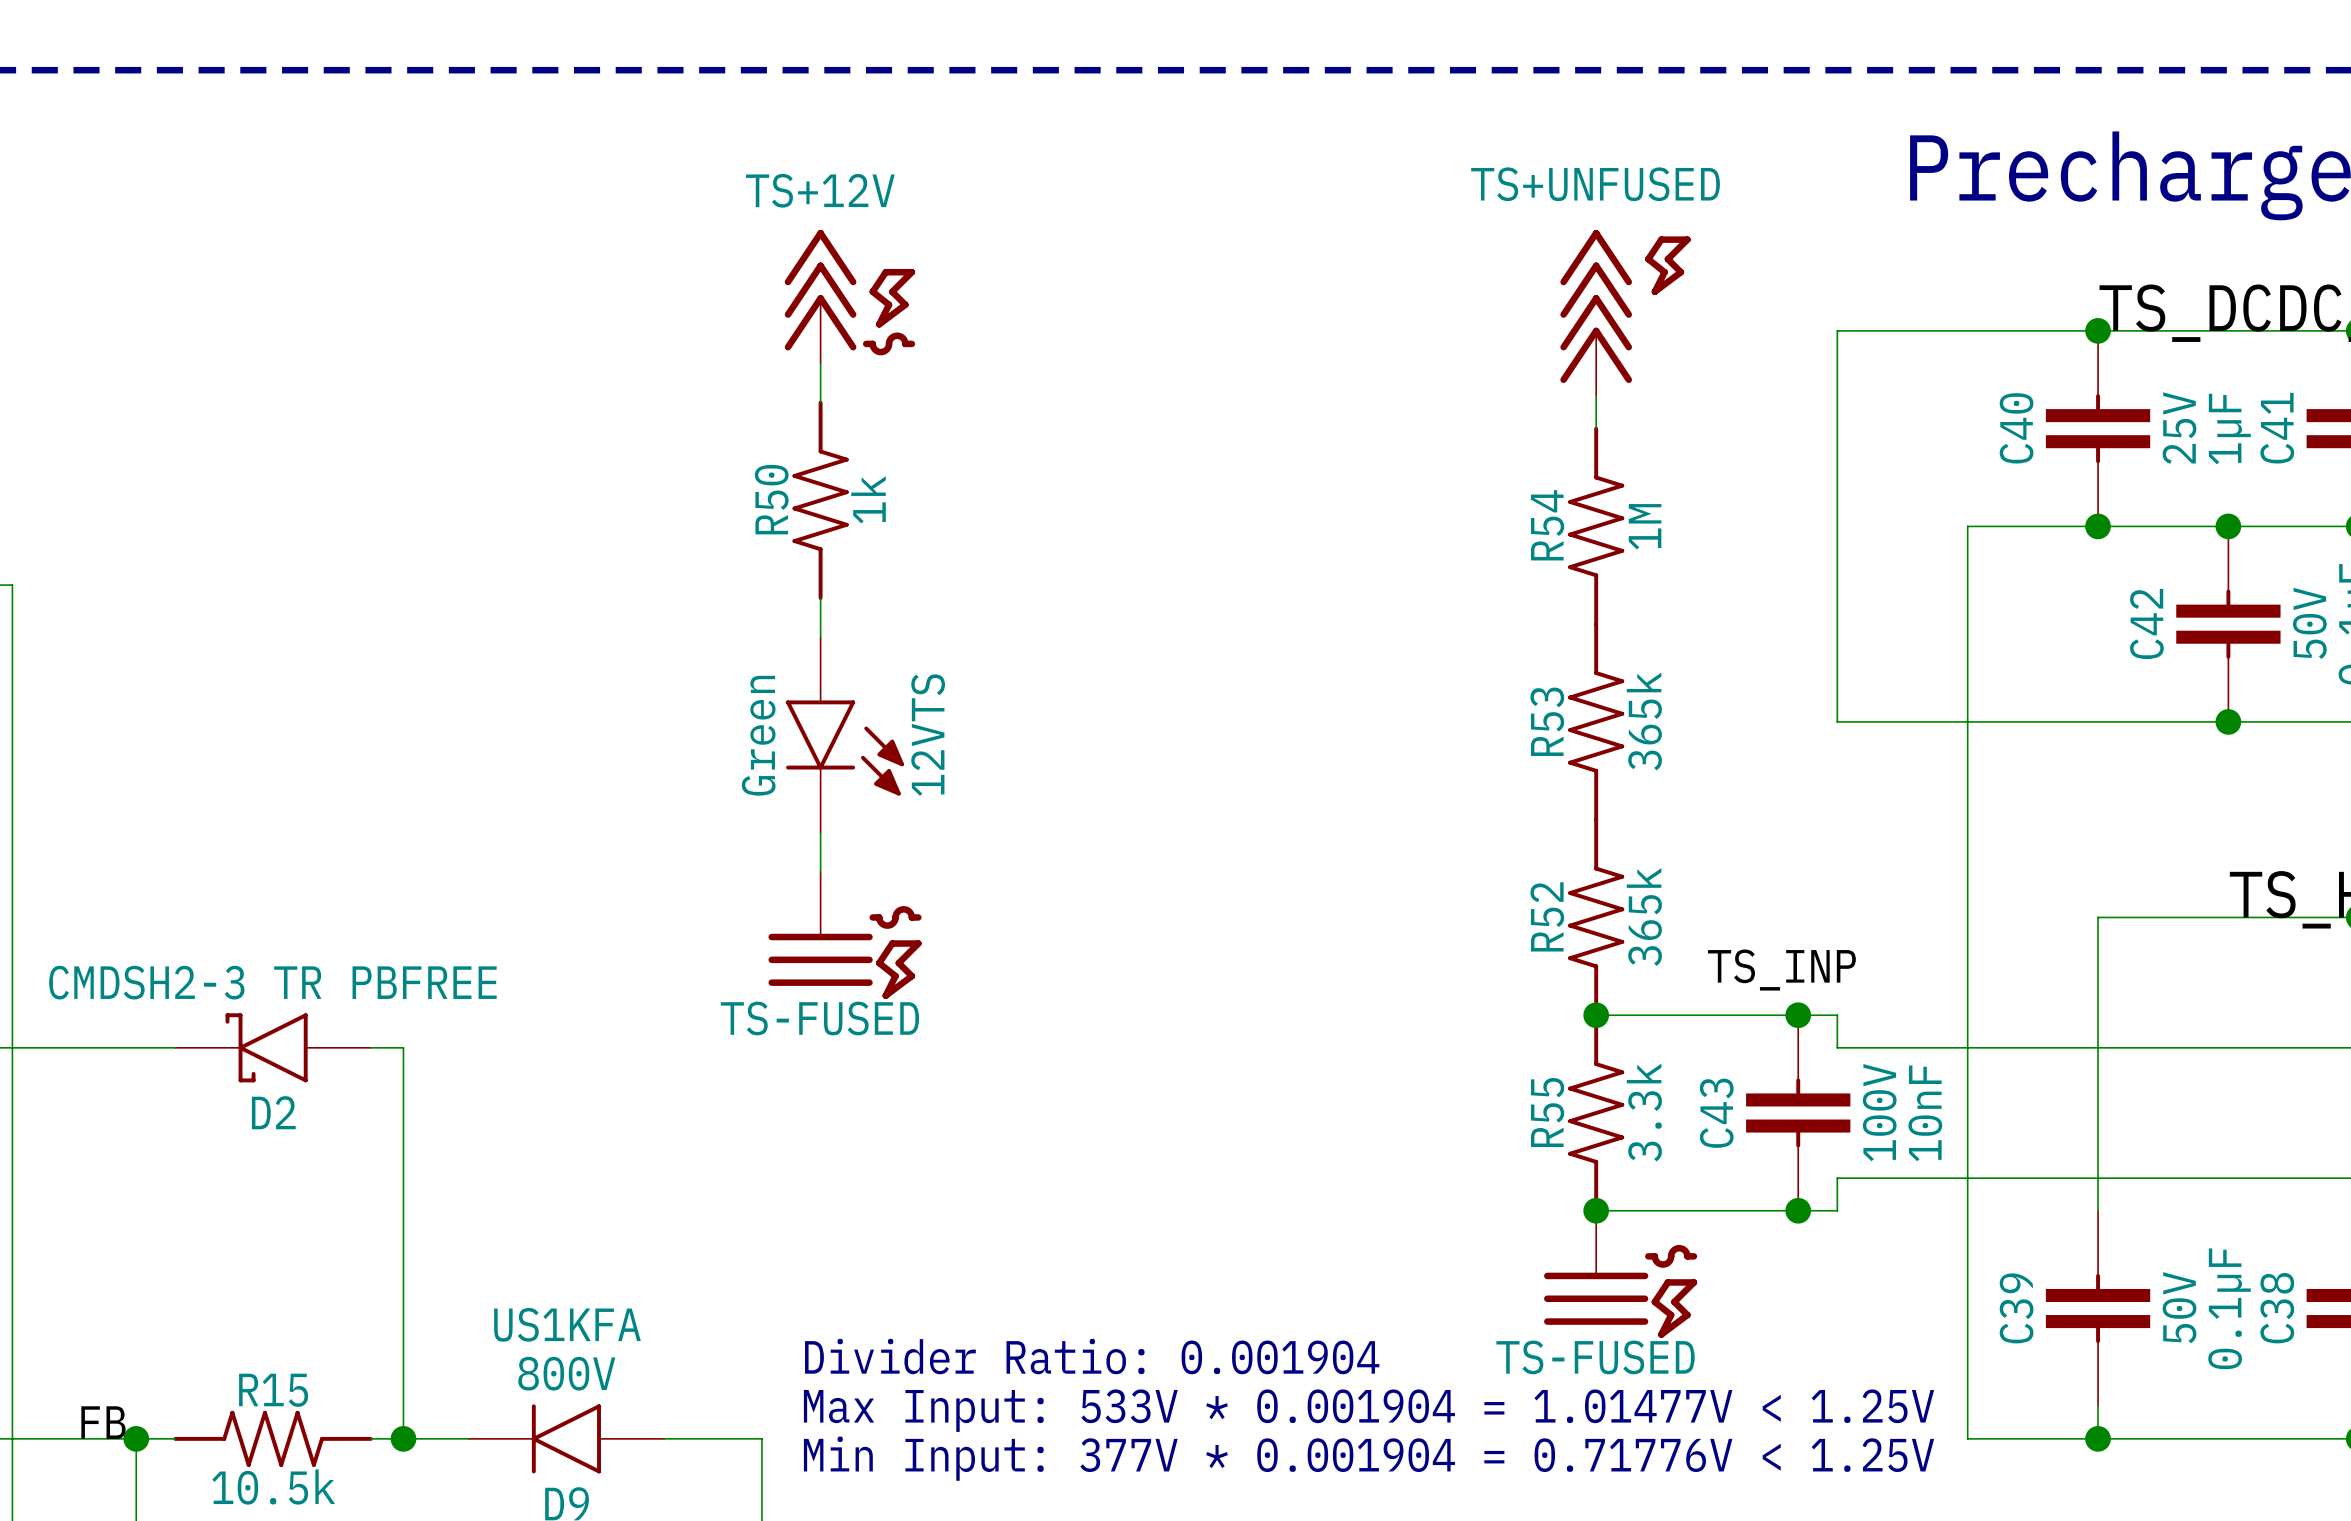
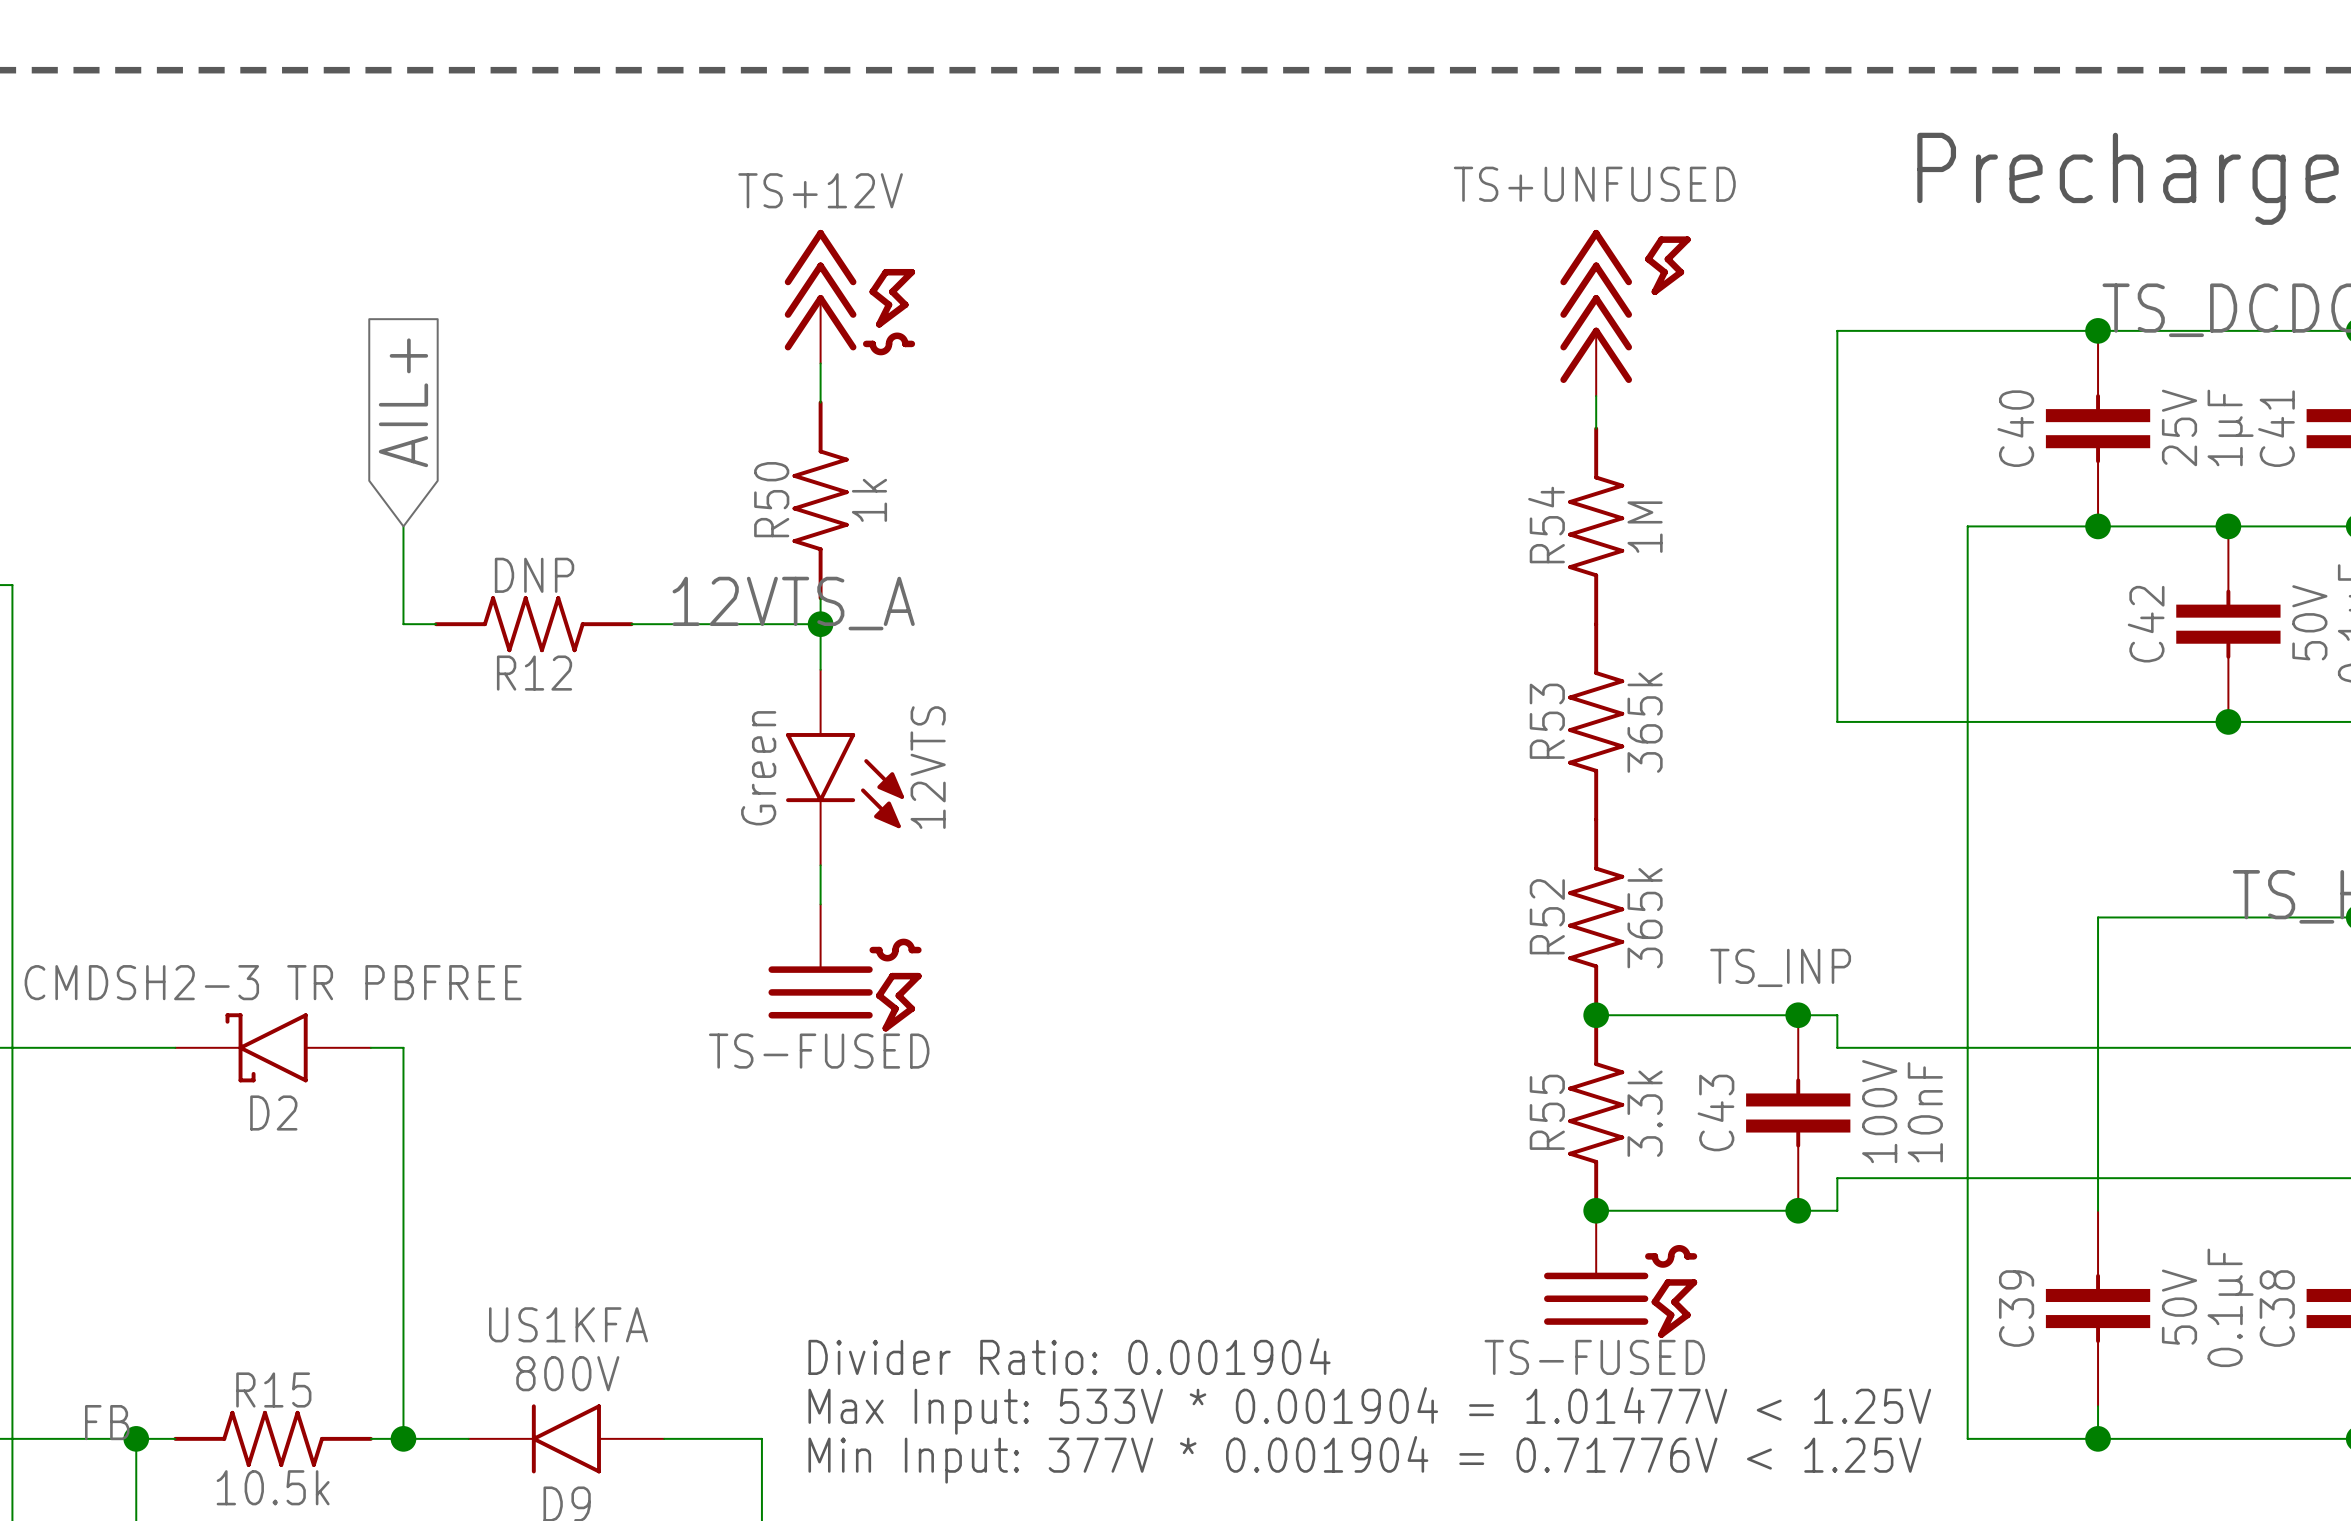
global label: none -> AIL+ (403, 402)
wire: none -> (403, 526) (403, 624) (436, 624)
label: none -> 12VTS_A (793, 603)
R12: none -> (533, 624)
wire: none -> (631, 624) (820, 624)
junction: none -> (820, 624)
12VTS position: (845, 734) -> (845, 767)
power symbol position: TS-FUSED (845, 935) -> TS-FUSED (845, 967)

